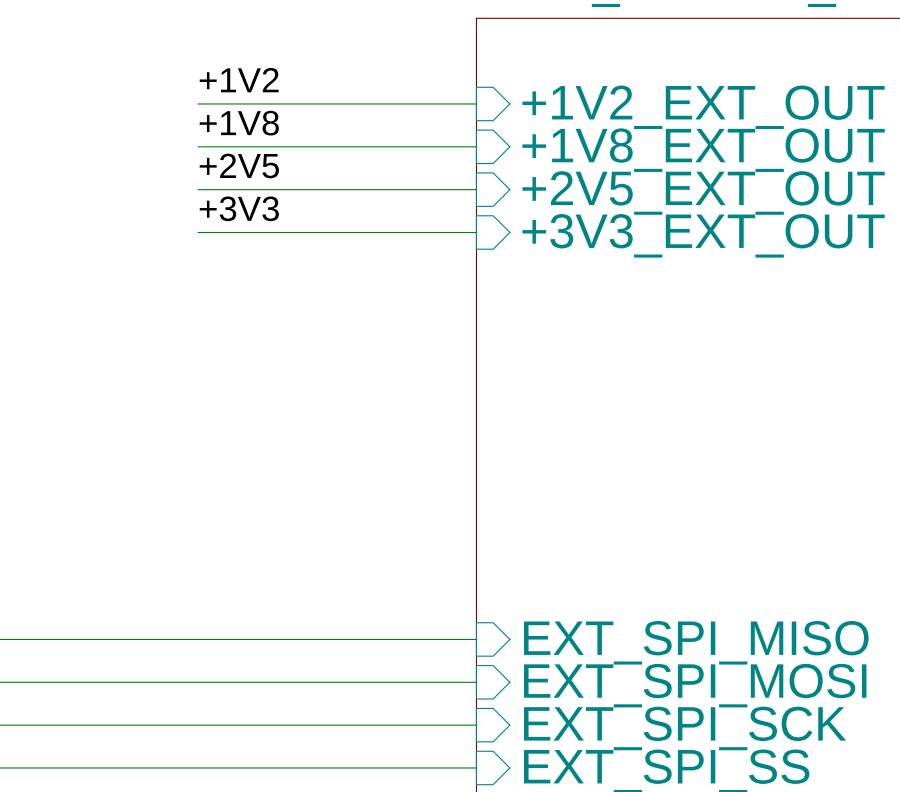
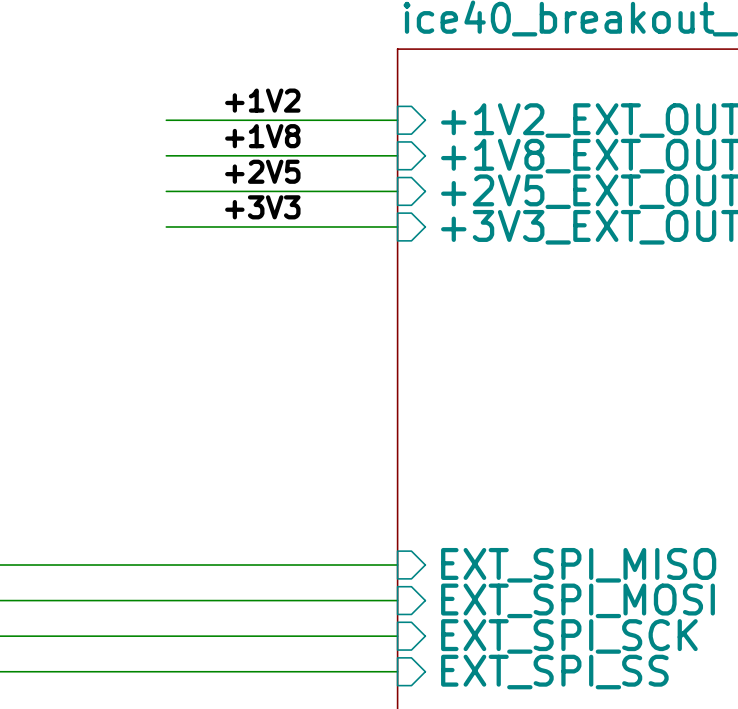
label position: +1V2 (239, 80) -> +1V2 (262, 100)
label position: +1V8 (239, 123) -> +1V8 (262, 136)
label position: +2V5 (239, 165) -> +2V5 (262, 171)
label position: +3V3 (239, 208) -> +3V3 (262, 207)

